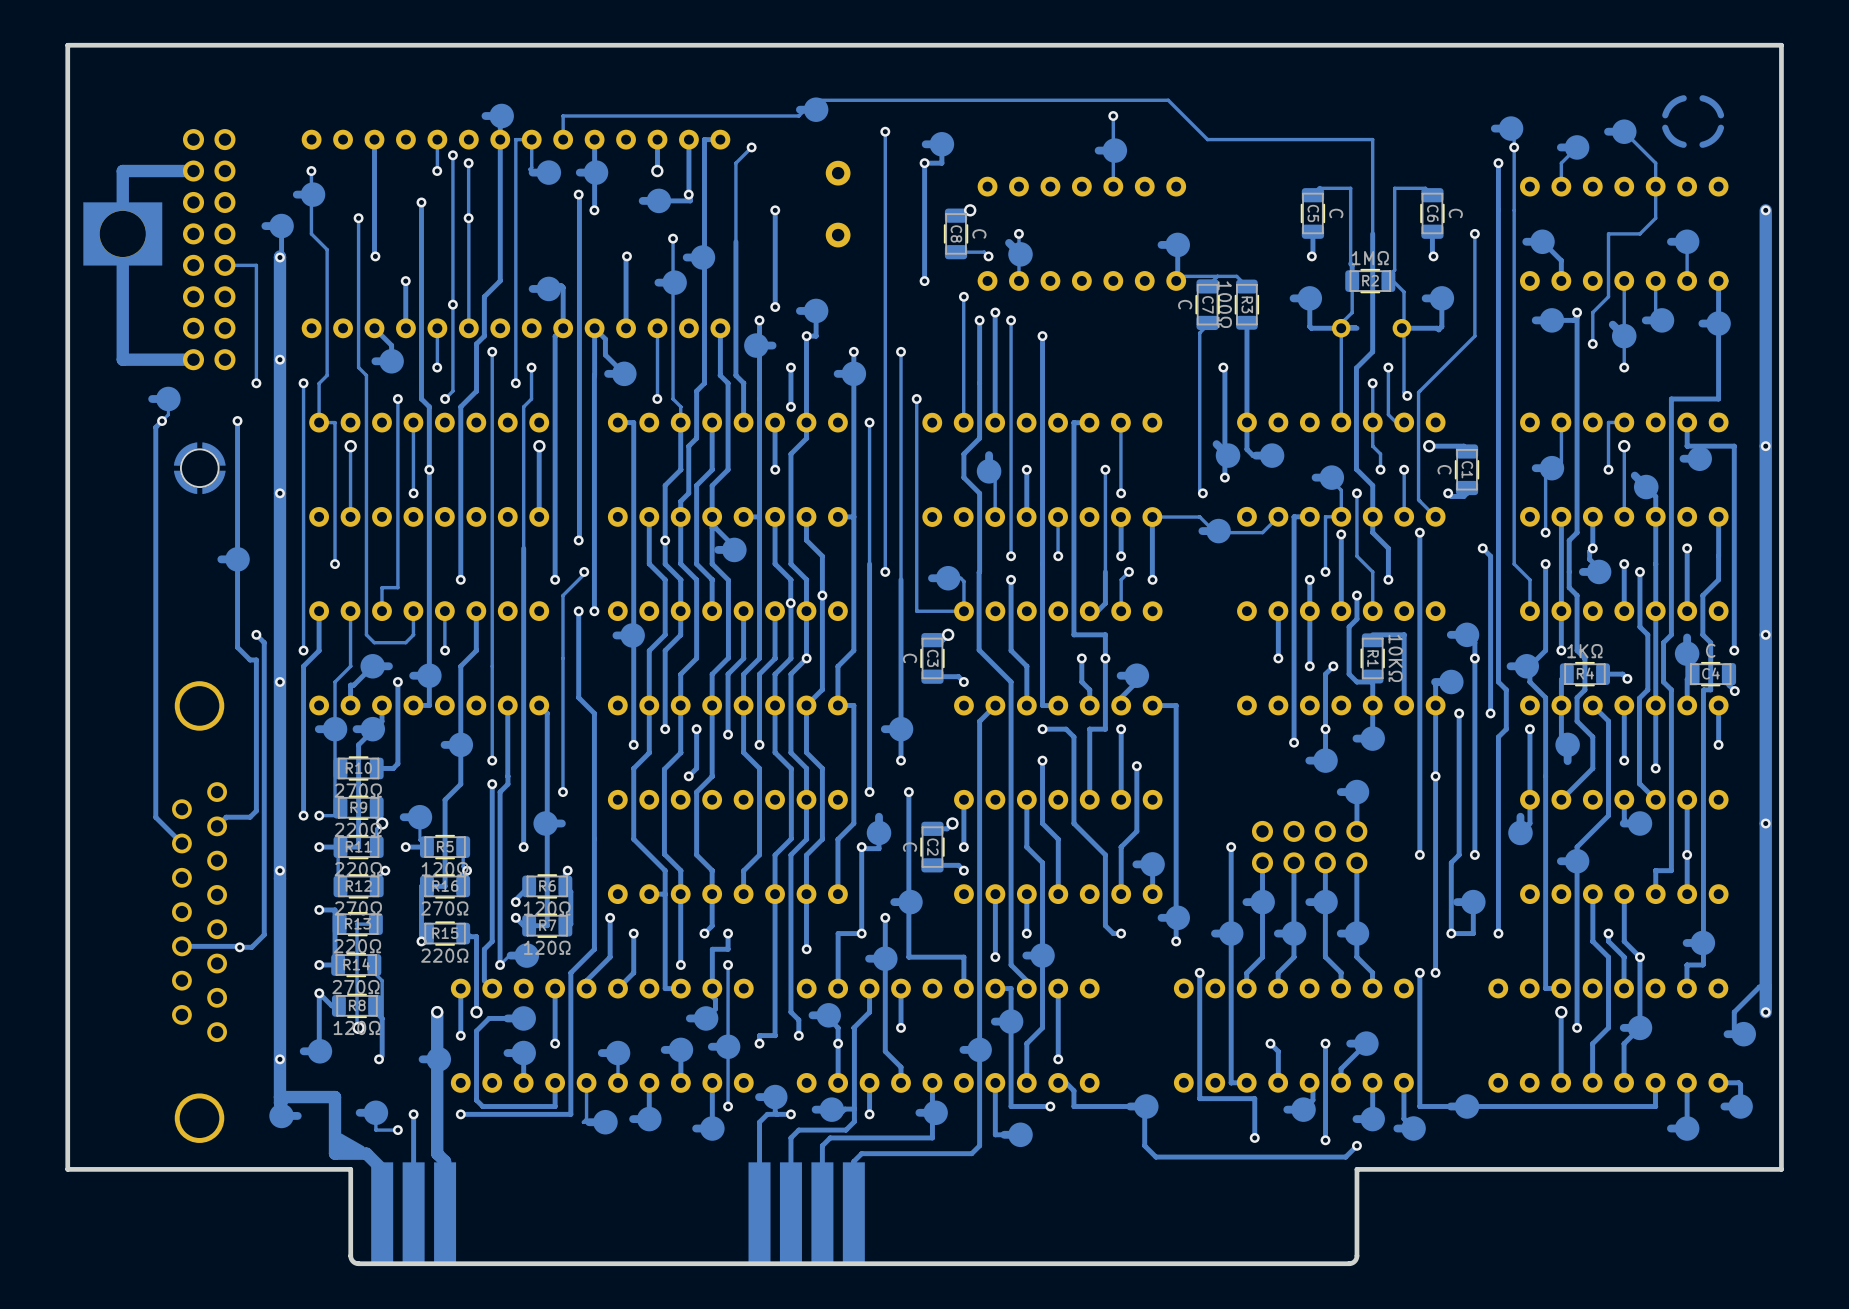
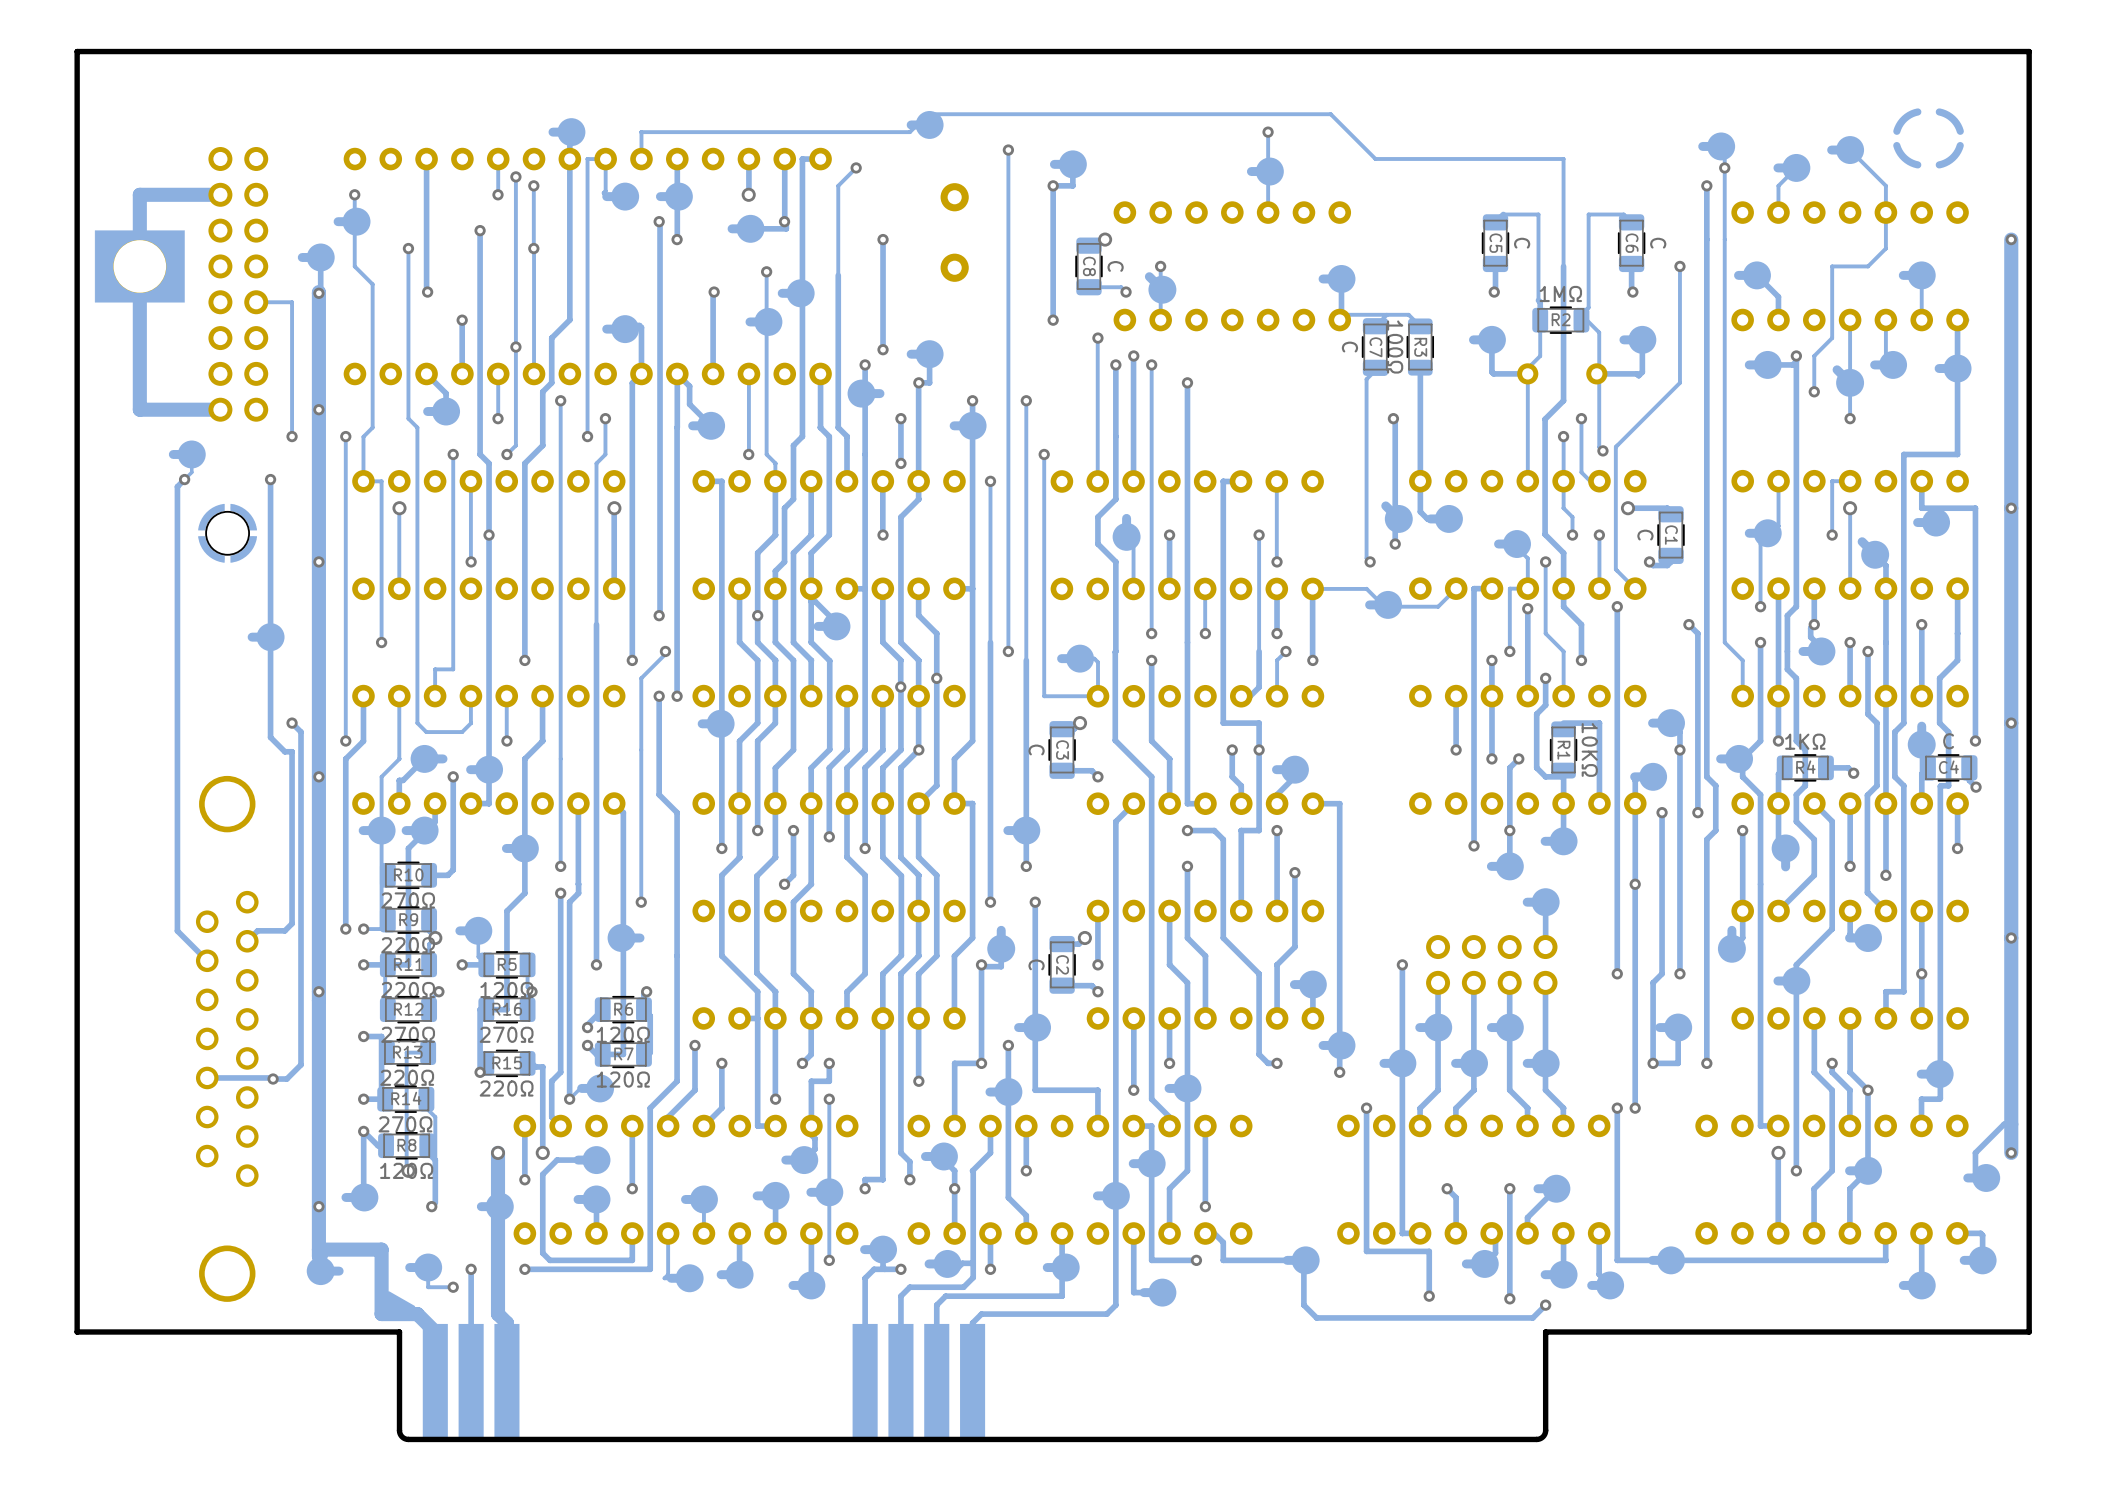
track: (1344, 326) (1356, 328) (1342, 328) -> none

